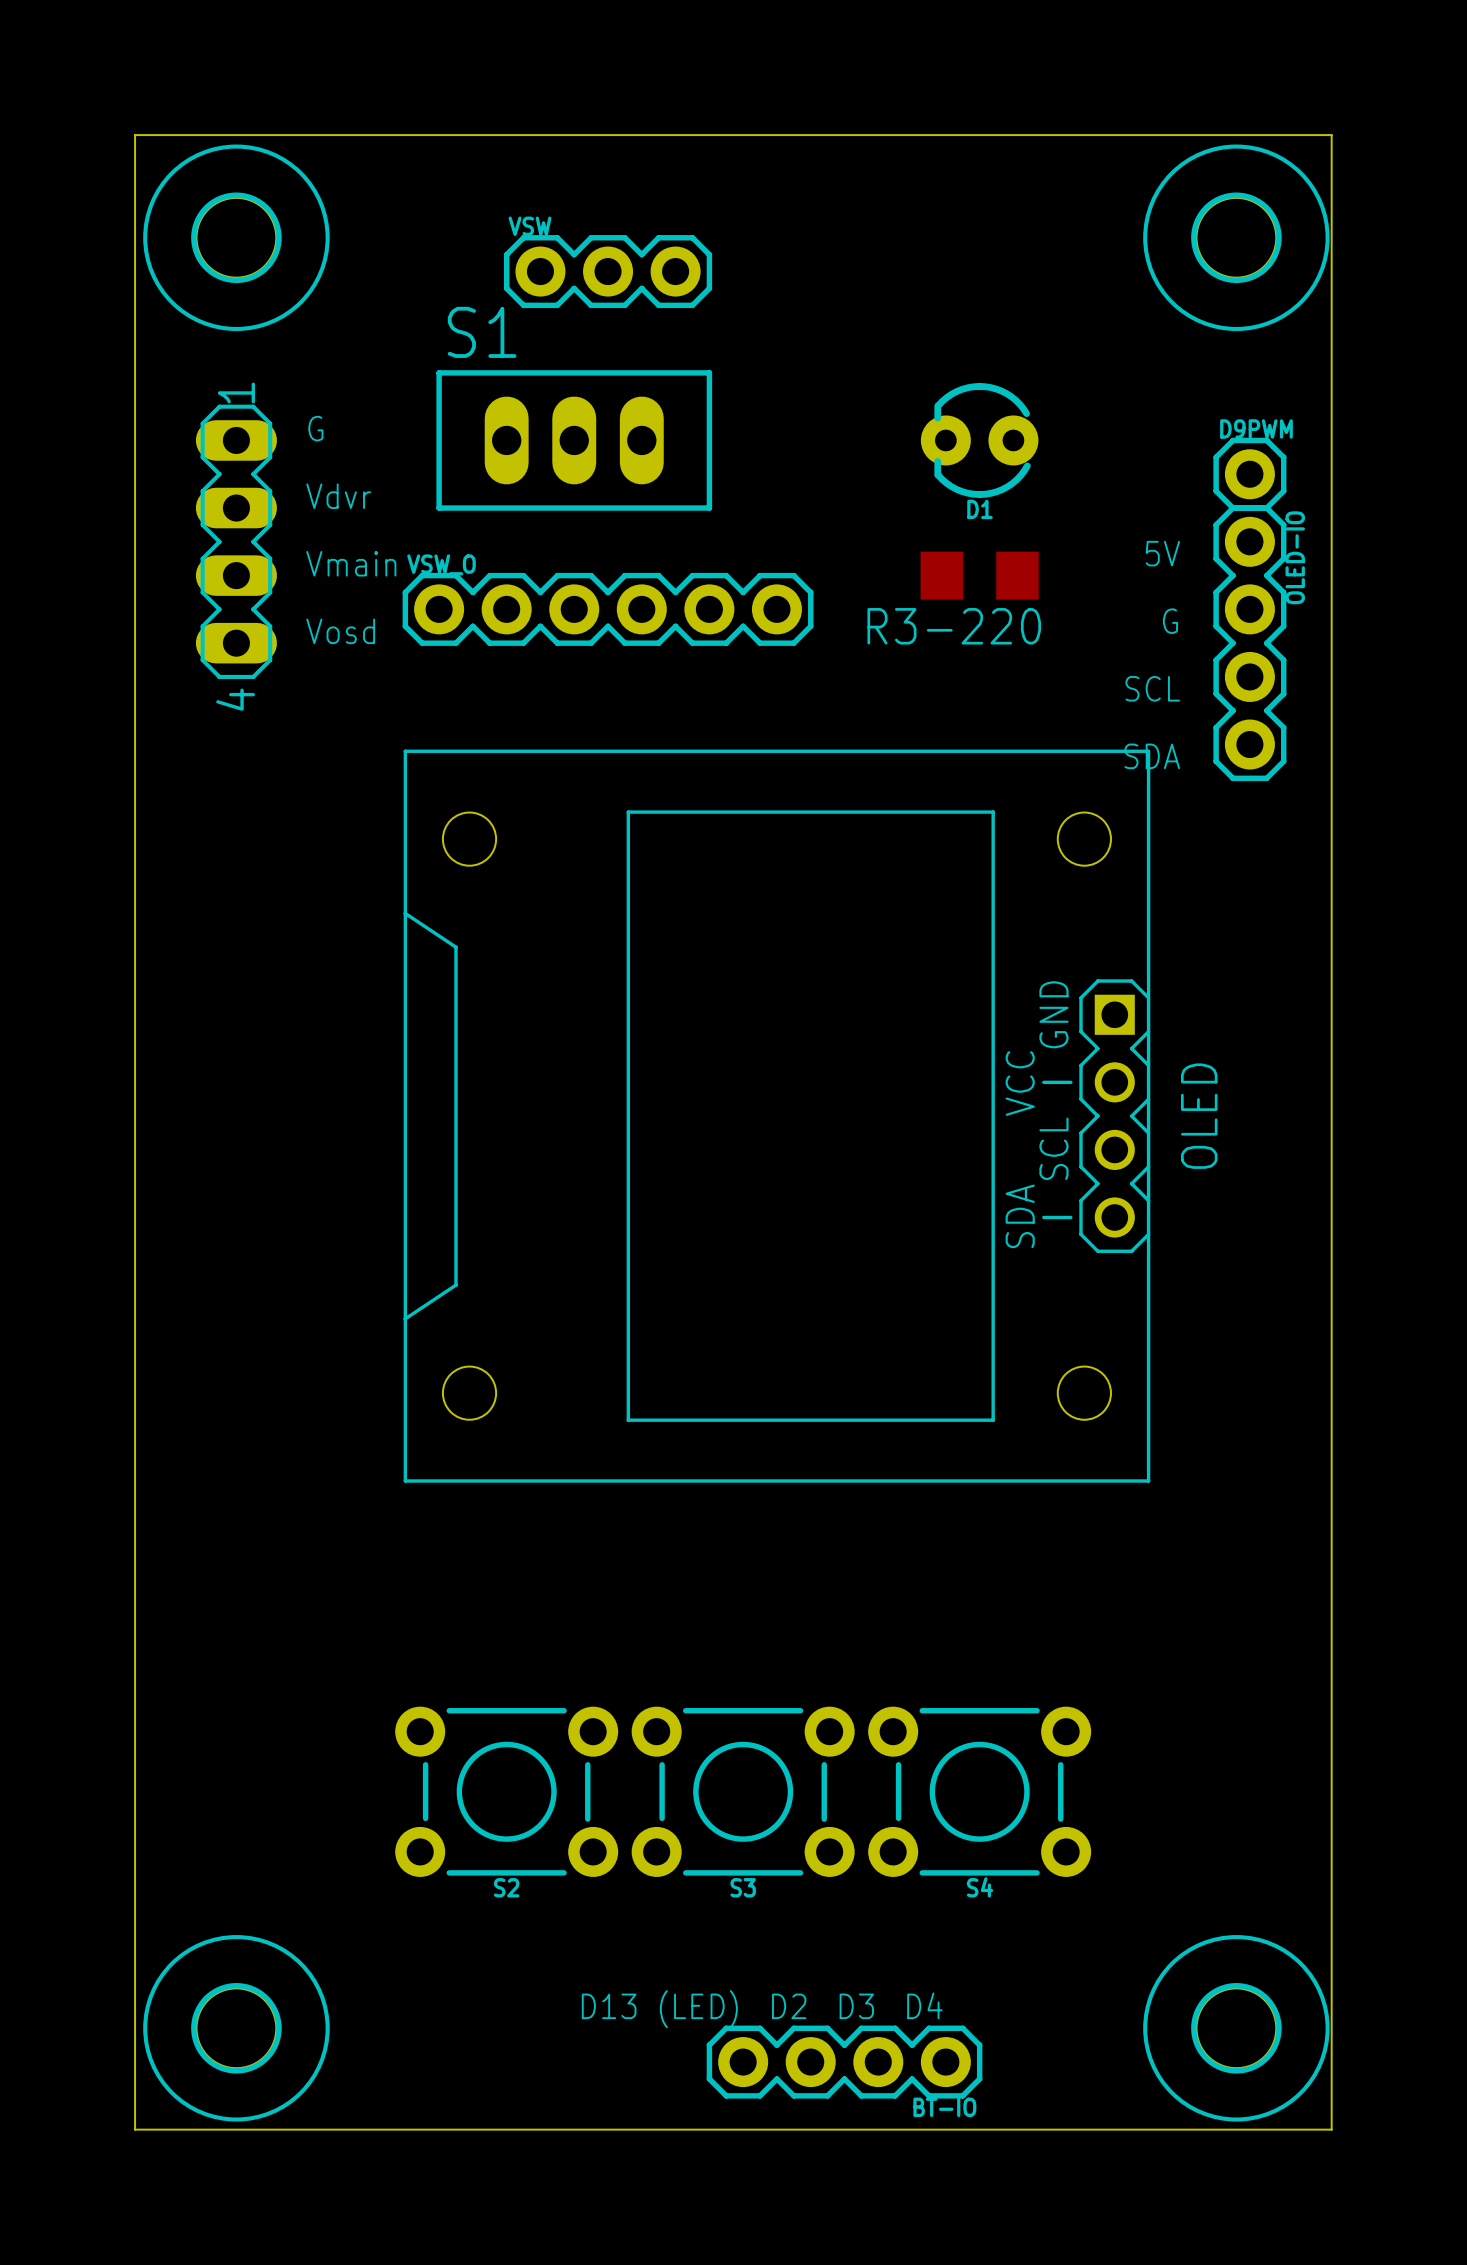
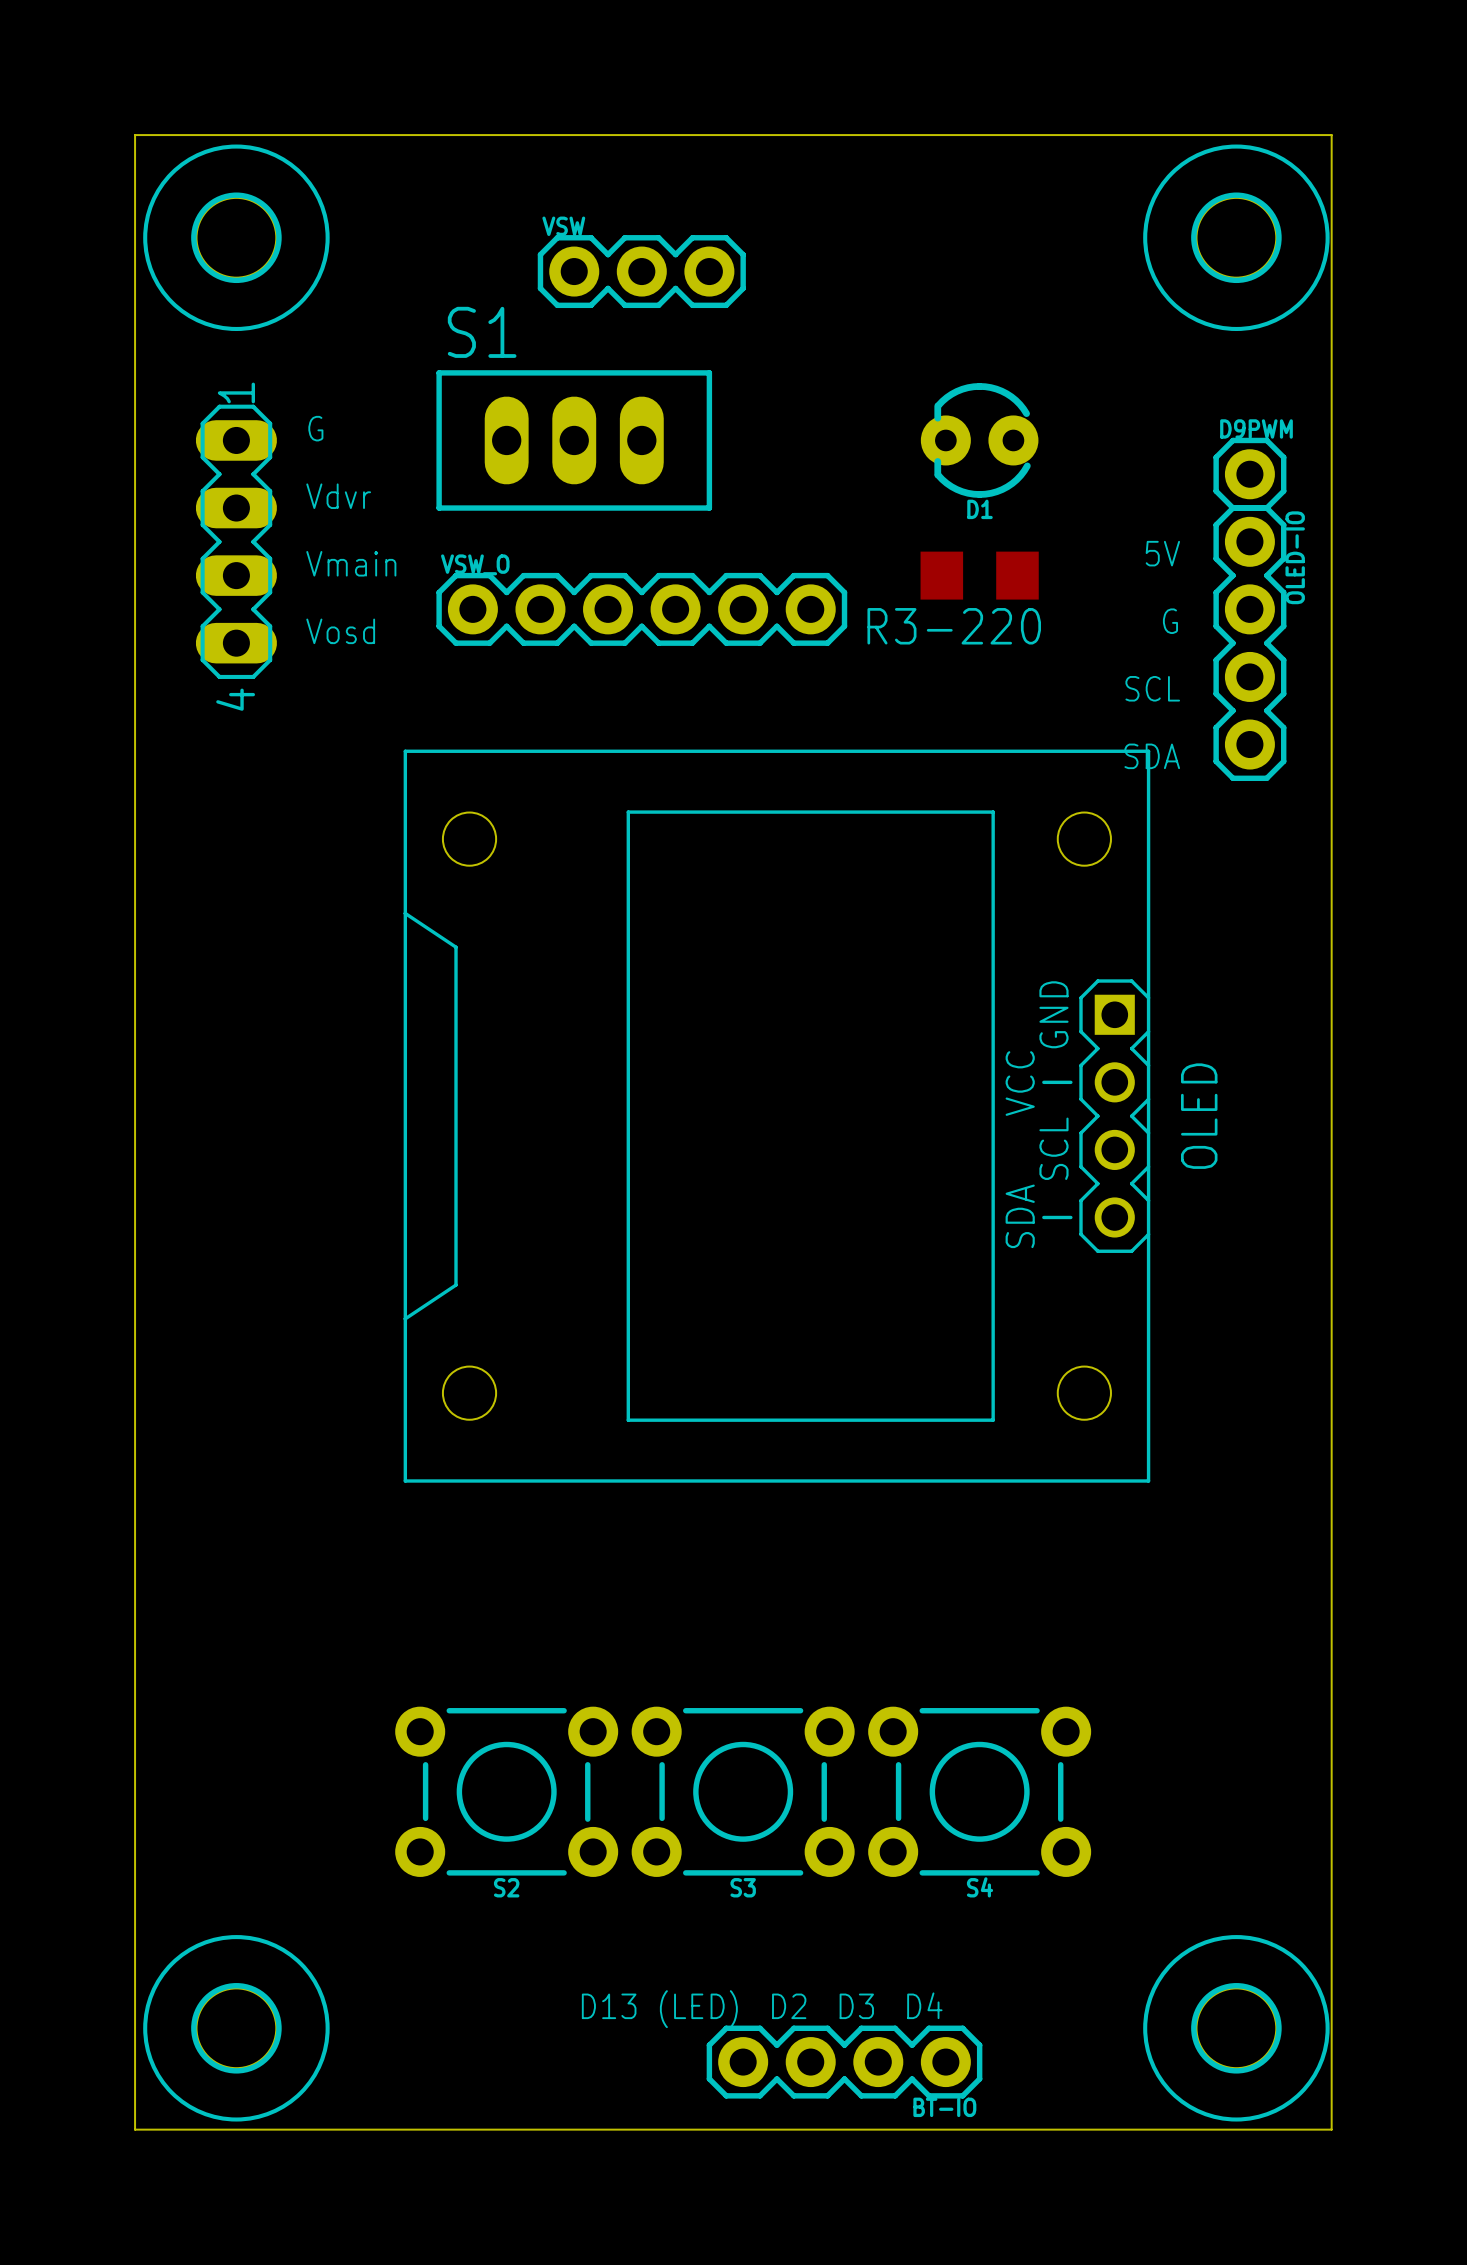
VSW position: (608, 271) -> (641, 271)
VSW_O position: (608, 609) -> (641, 609)

